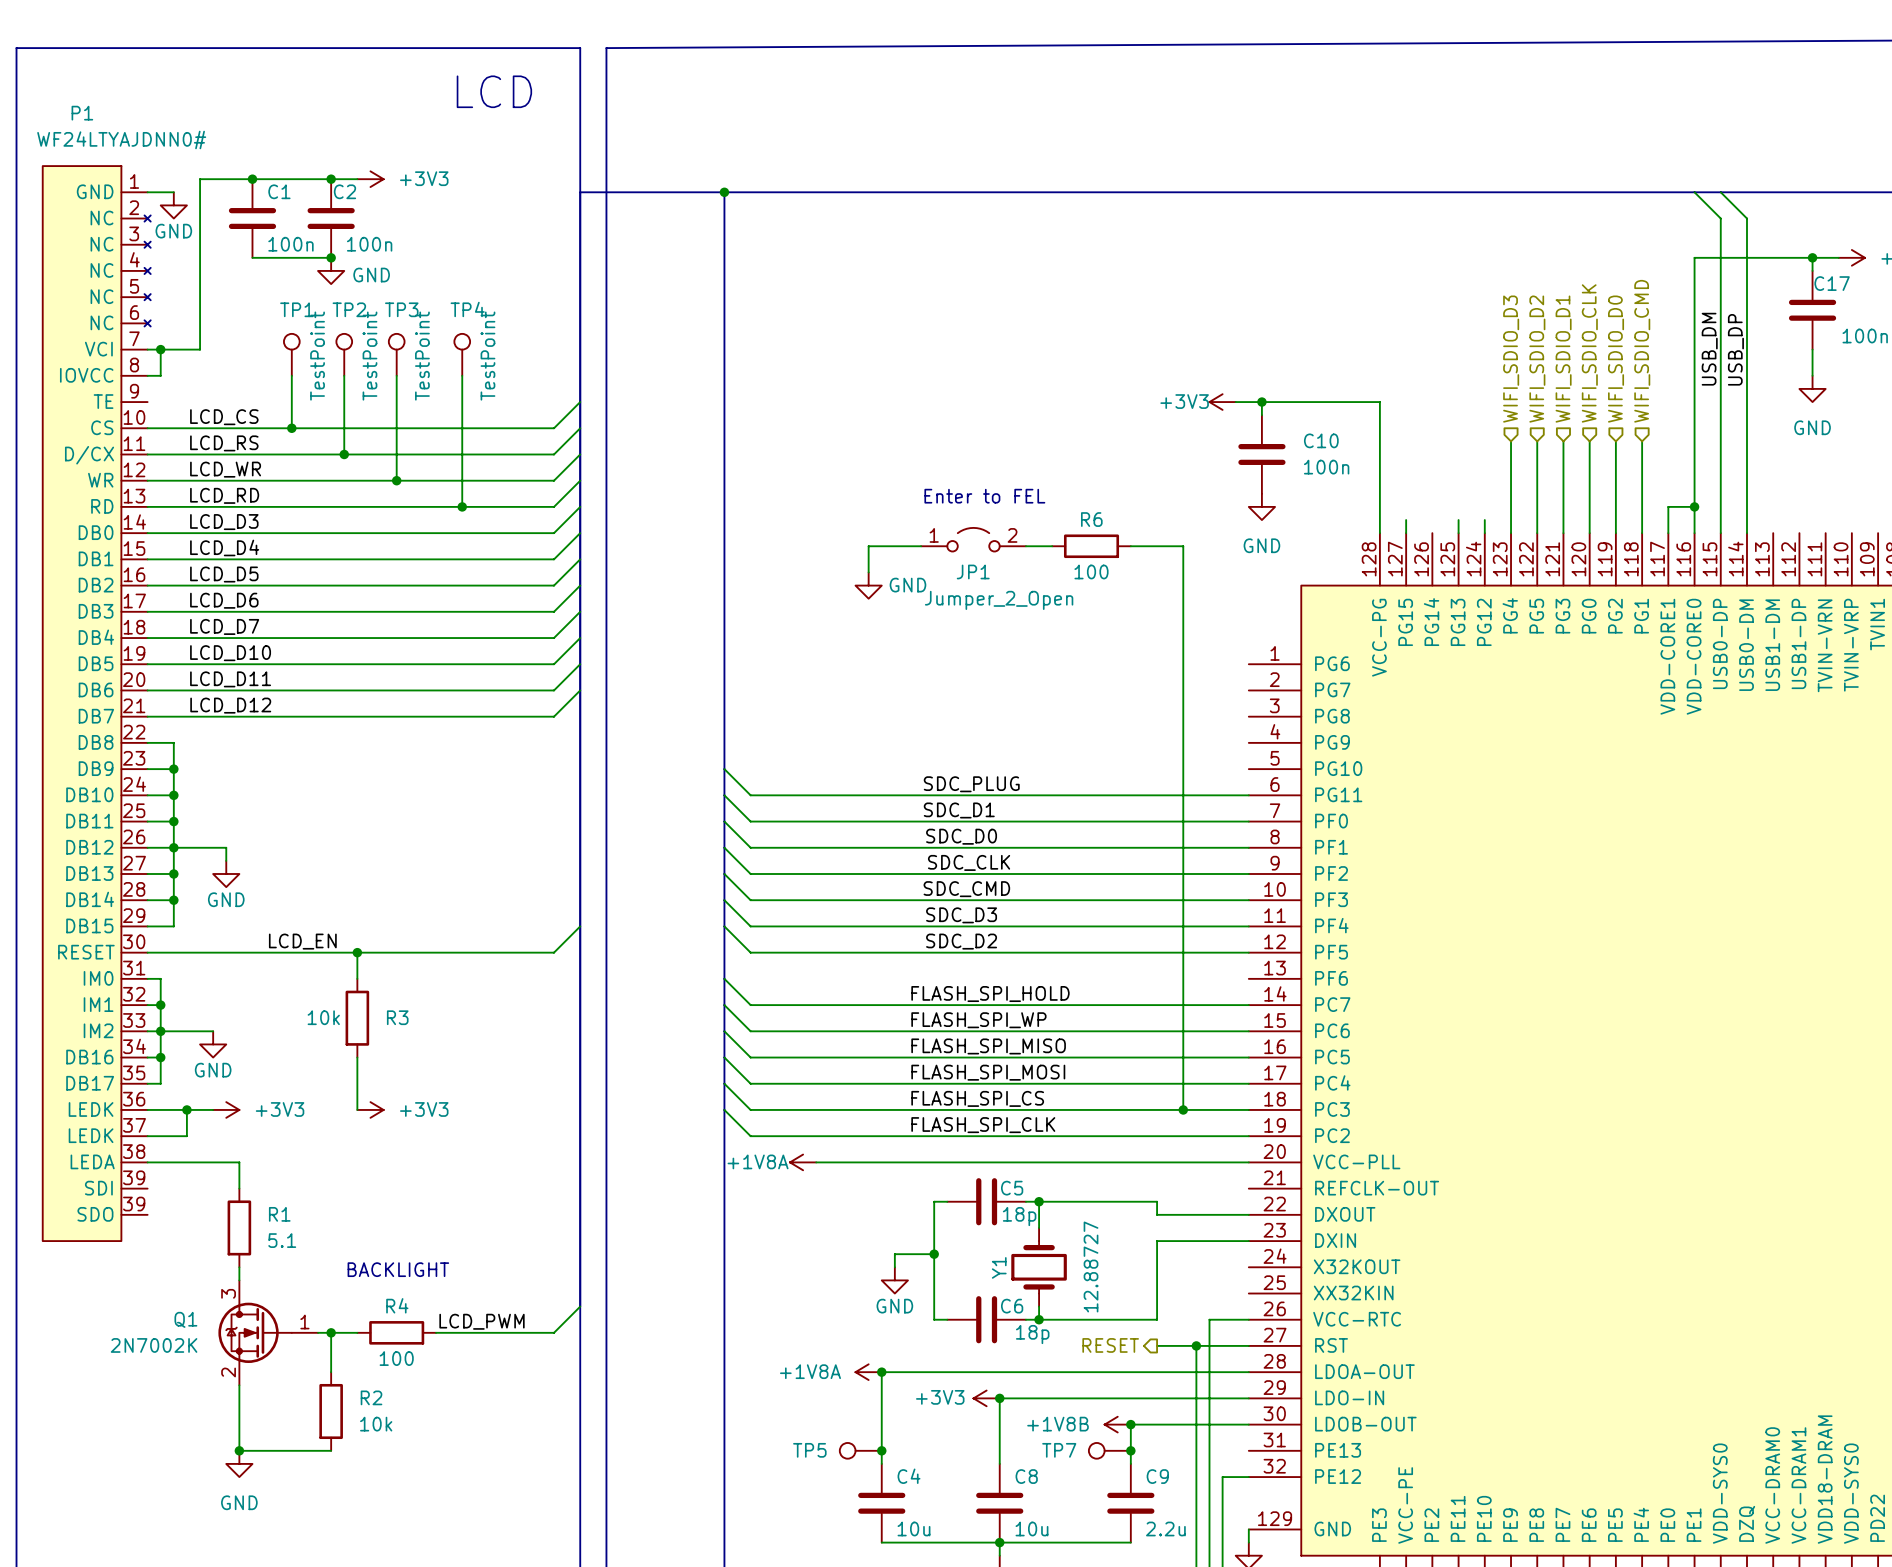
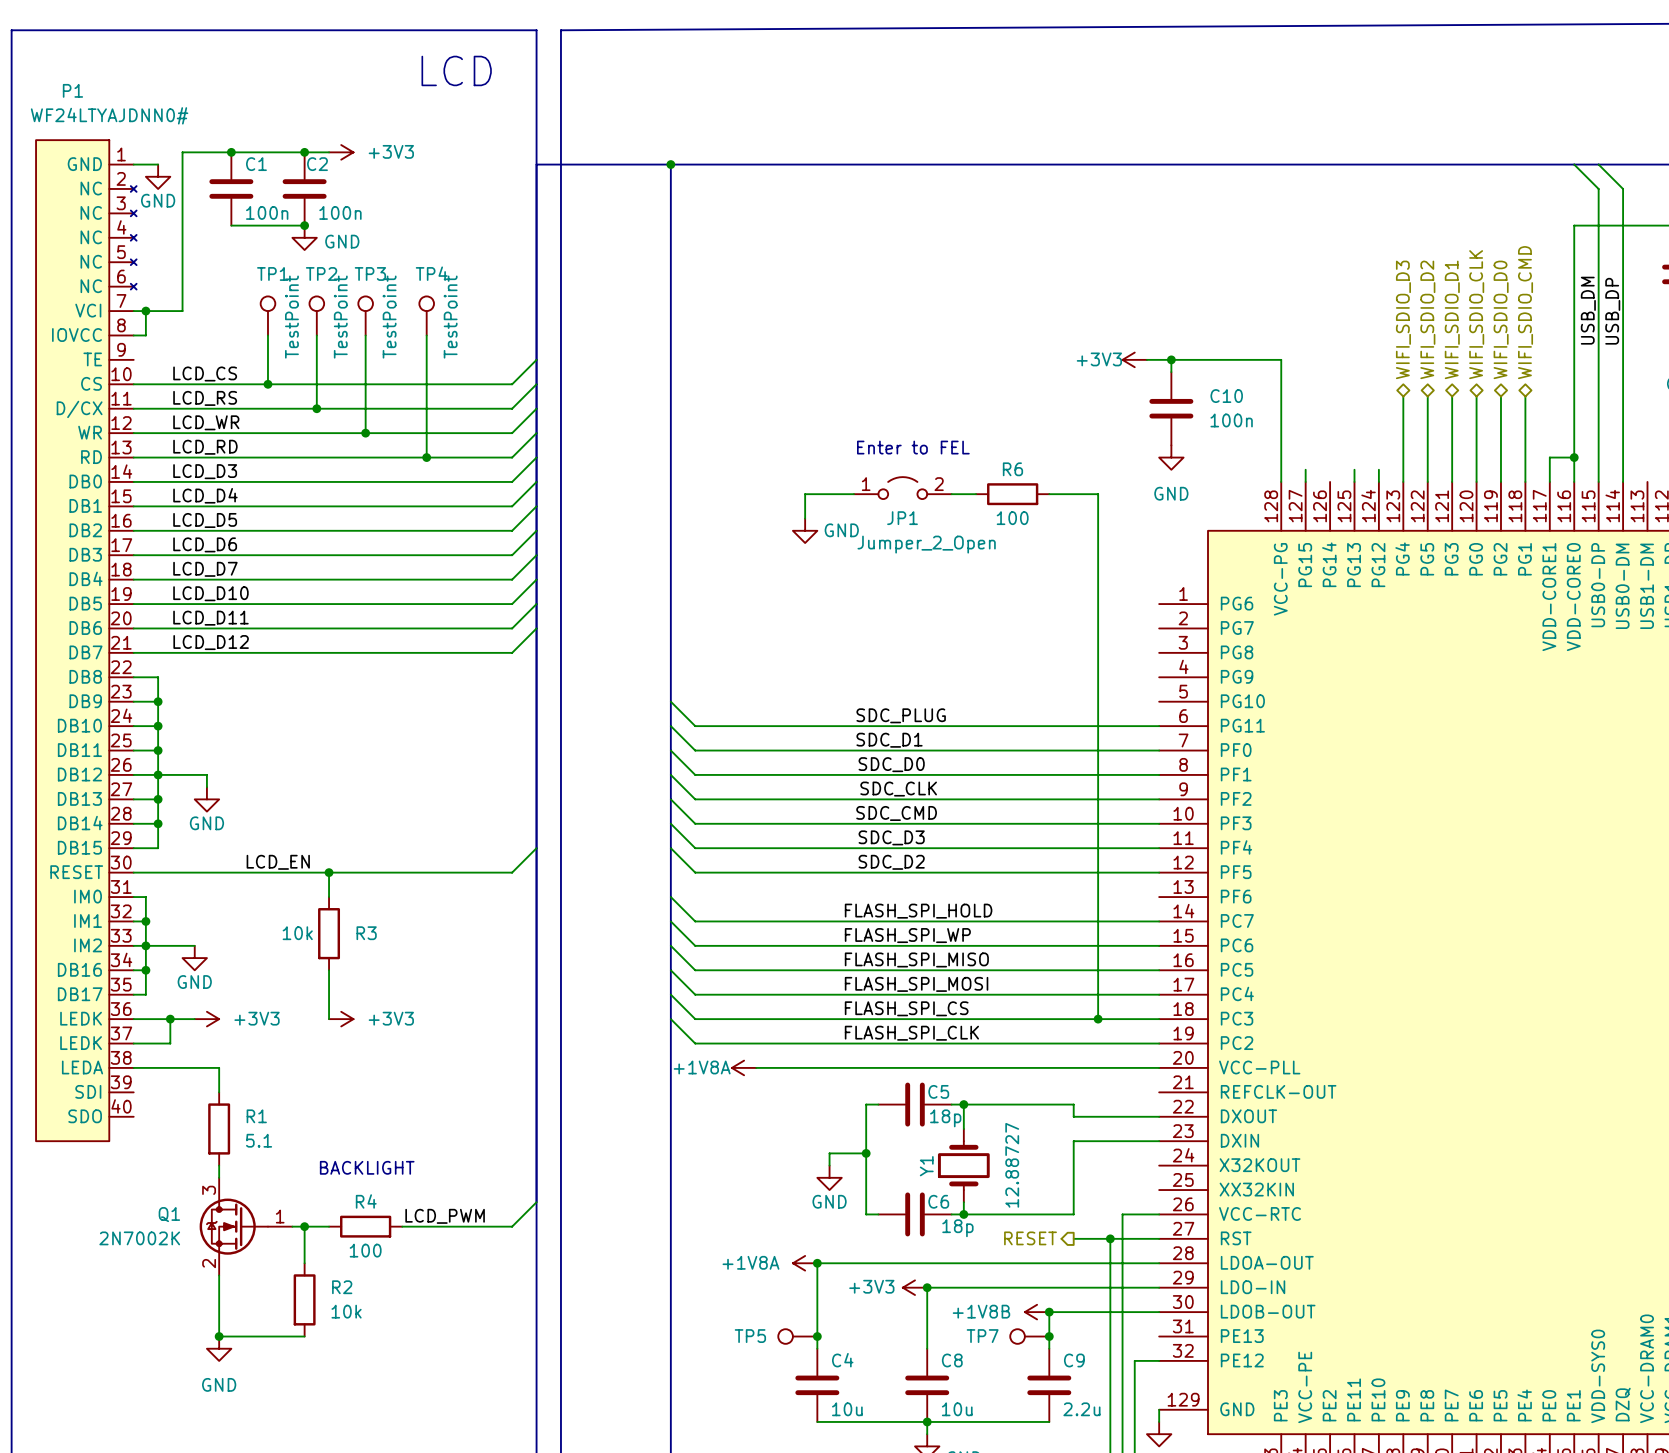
hierarchical label shape: input (1642, 351) -> bidirectional (1525, 312)
hierarchical label shape: input (1589, 353) -> bidirectional (1476, 314)
hierarchical label shape: input (1511, 359) -> bidirectional (1403, 319)
hierarchical label shape: input (1537, 359) -> bidirectional (1427, 319)
hierarchical label shape: input (1563, 359) -> bidirectional (1452, 319)
hierarchical label shape: input (1616, 359) -> bidirectional (1501, 319)
P1 pin number: 39 (134, 1204) -> 40 (121, 1106)

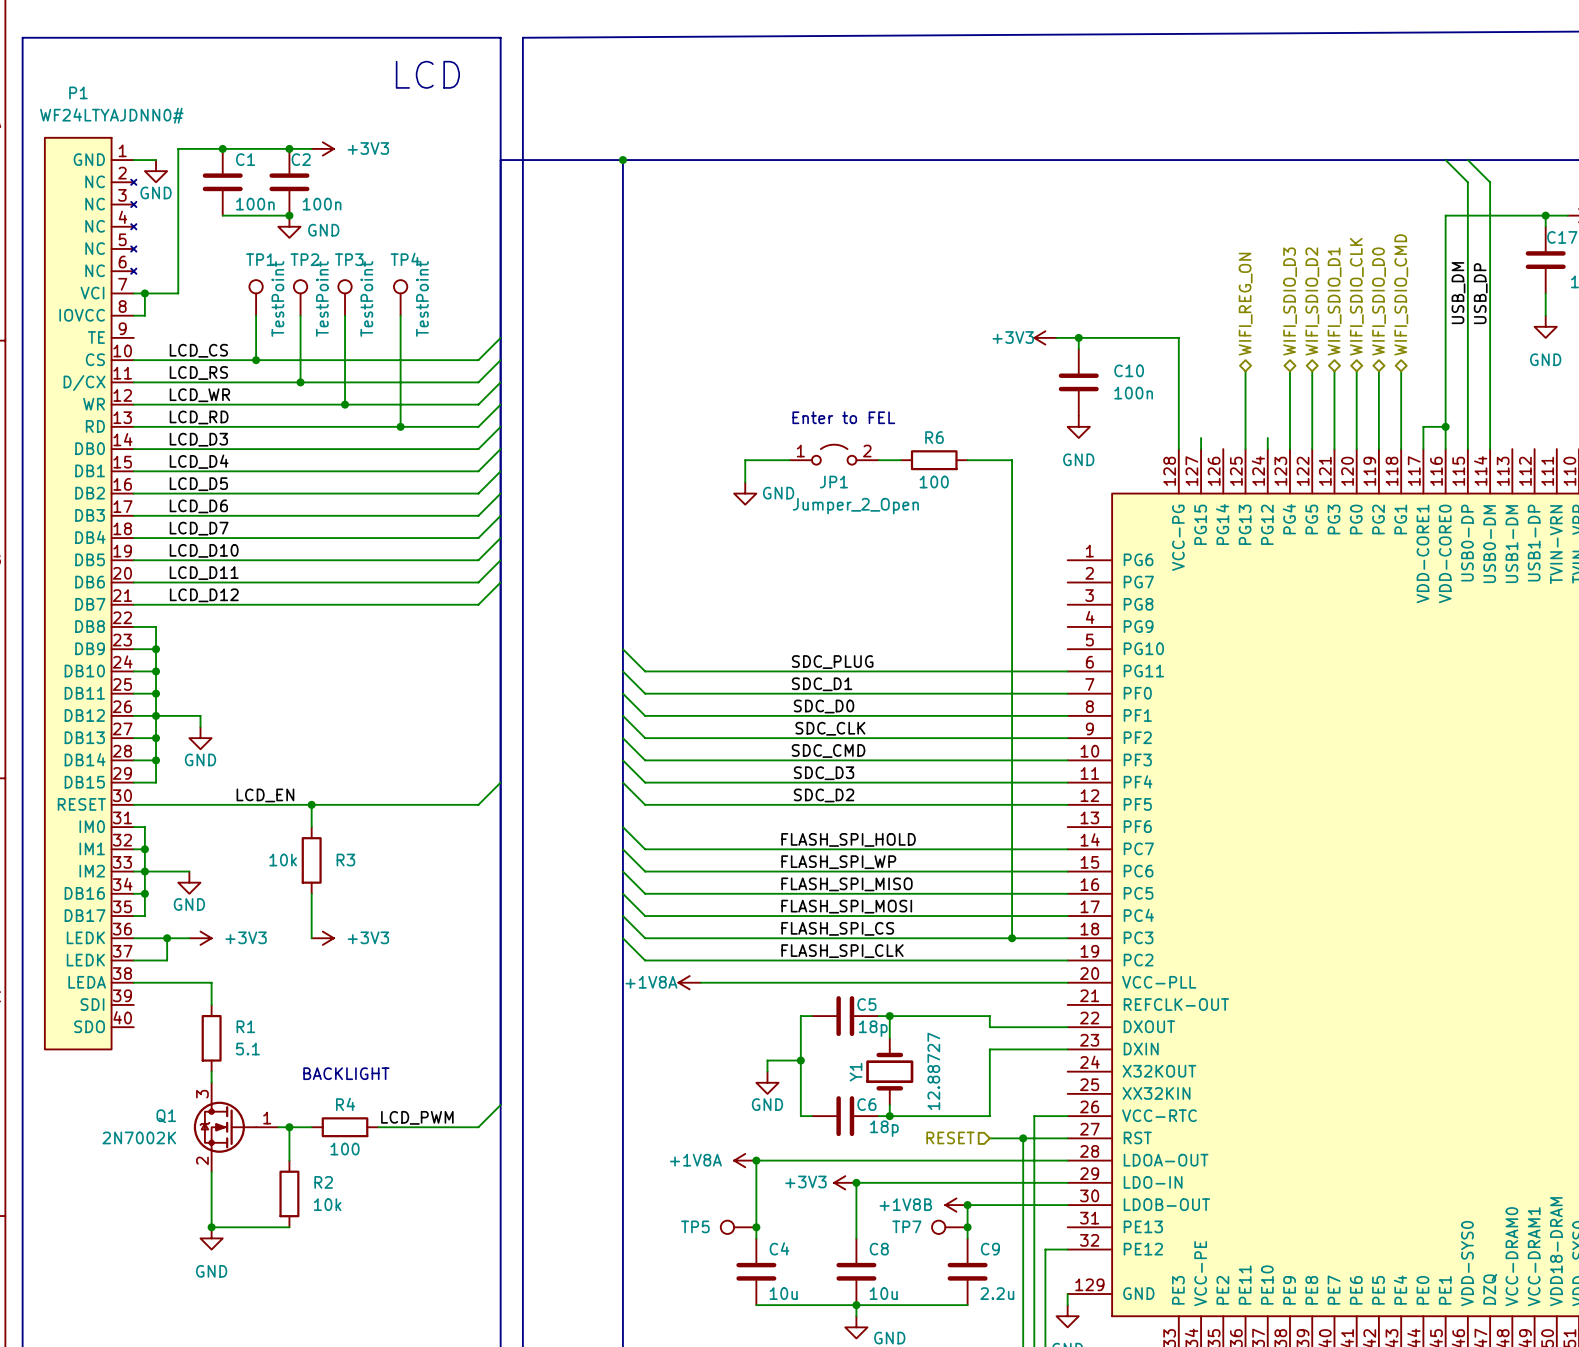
hierarchical label: none -> WIFI_REG_ON (1245, 304)
wire: none -> (1245, 371) (1245, 437)
hierarchical label shape: output (1030, 1238) -> input (950, 1137)

